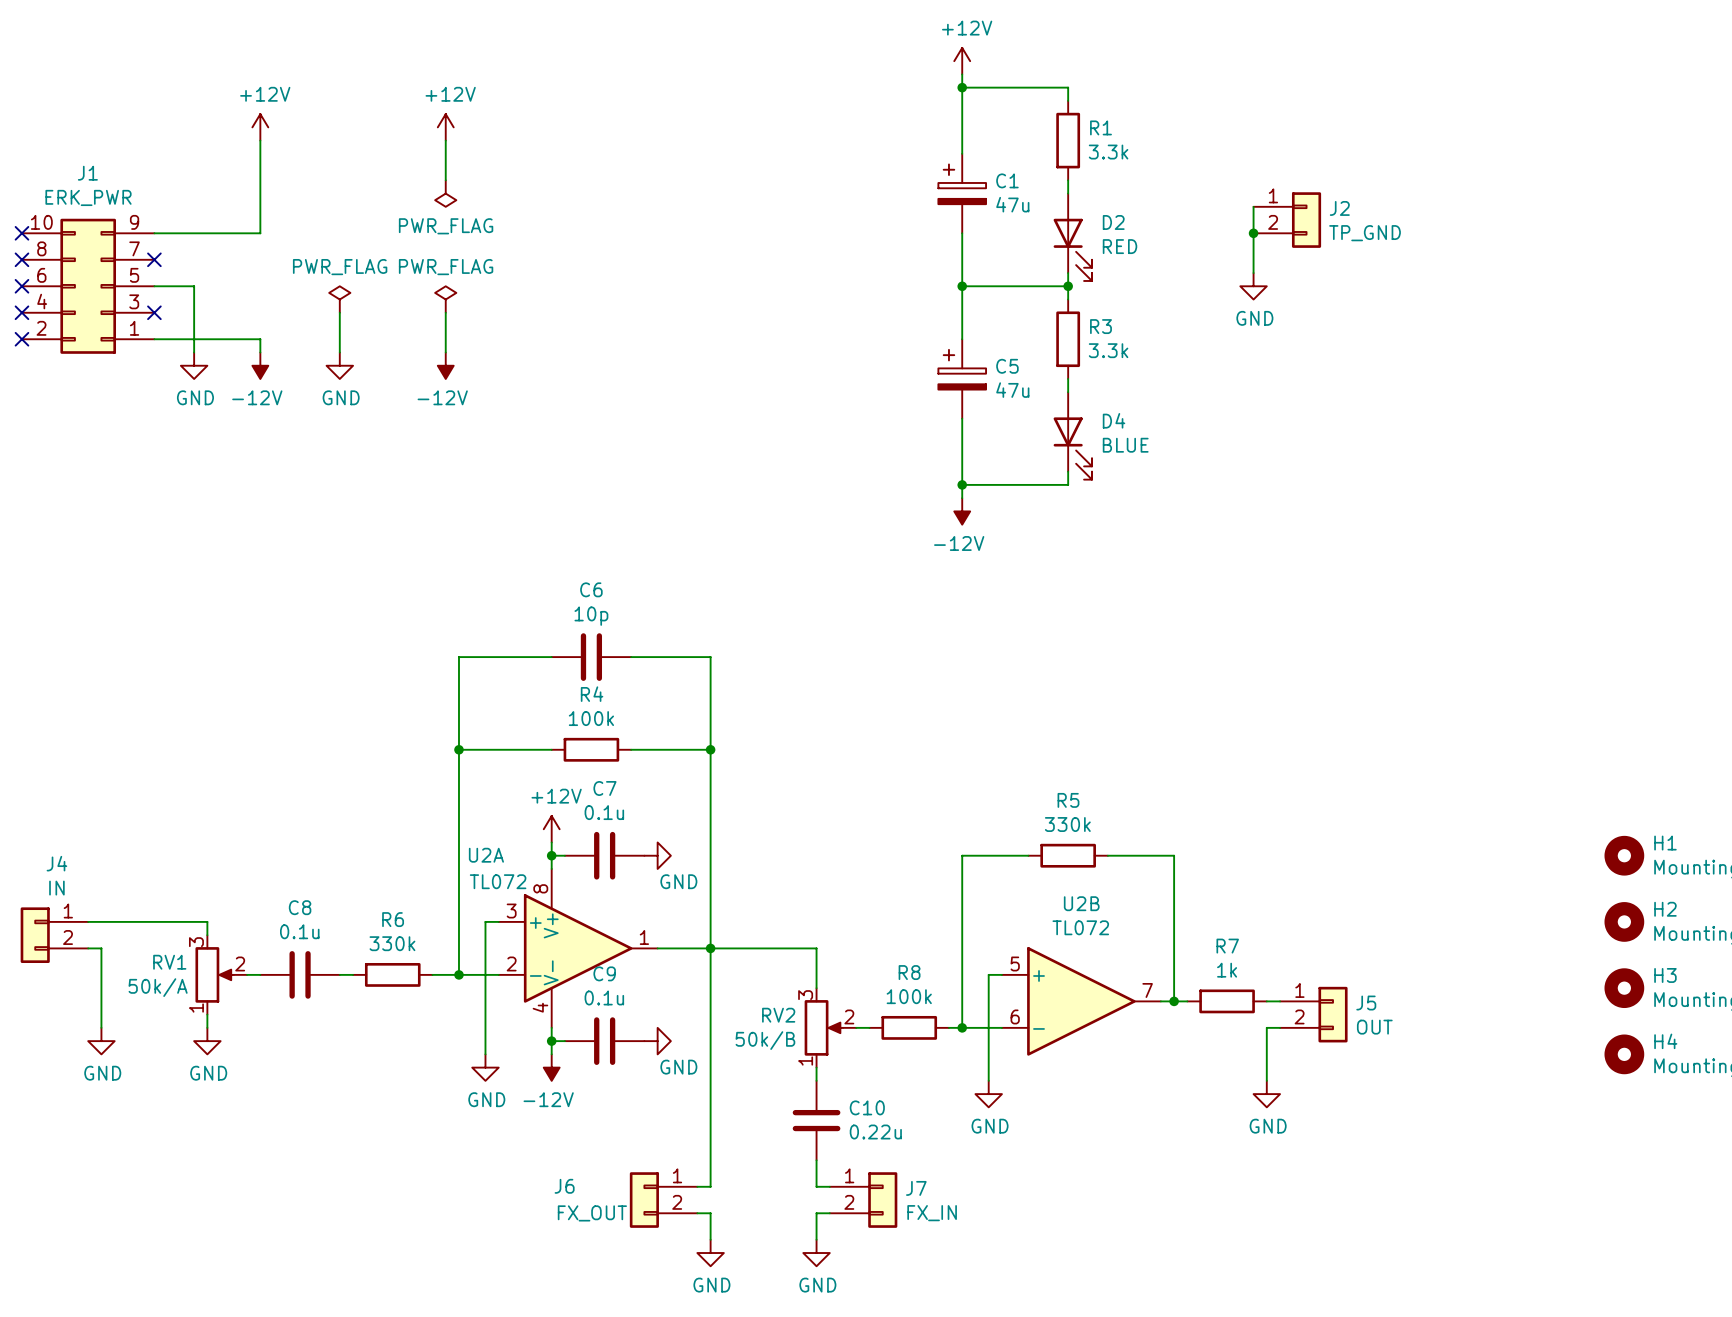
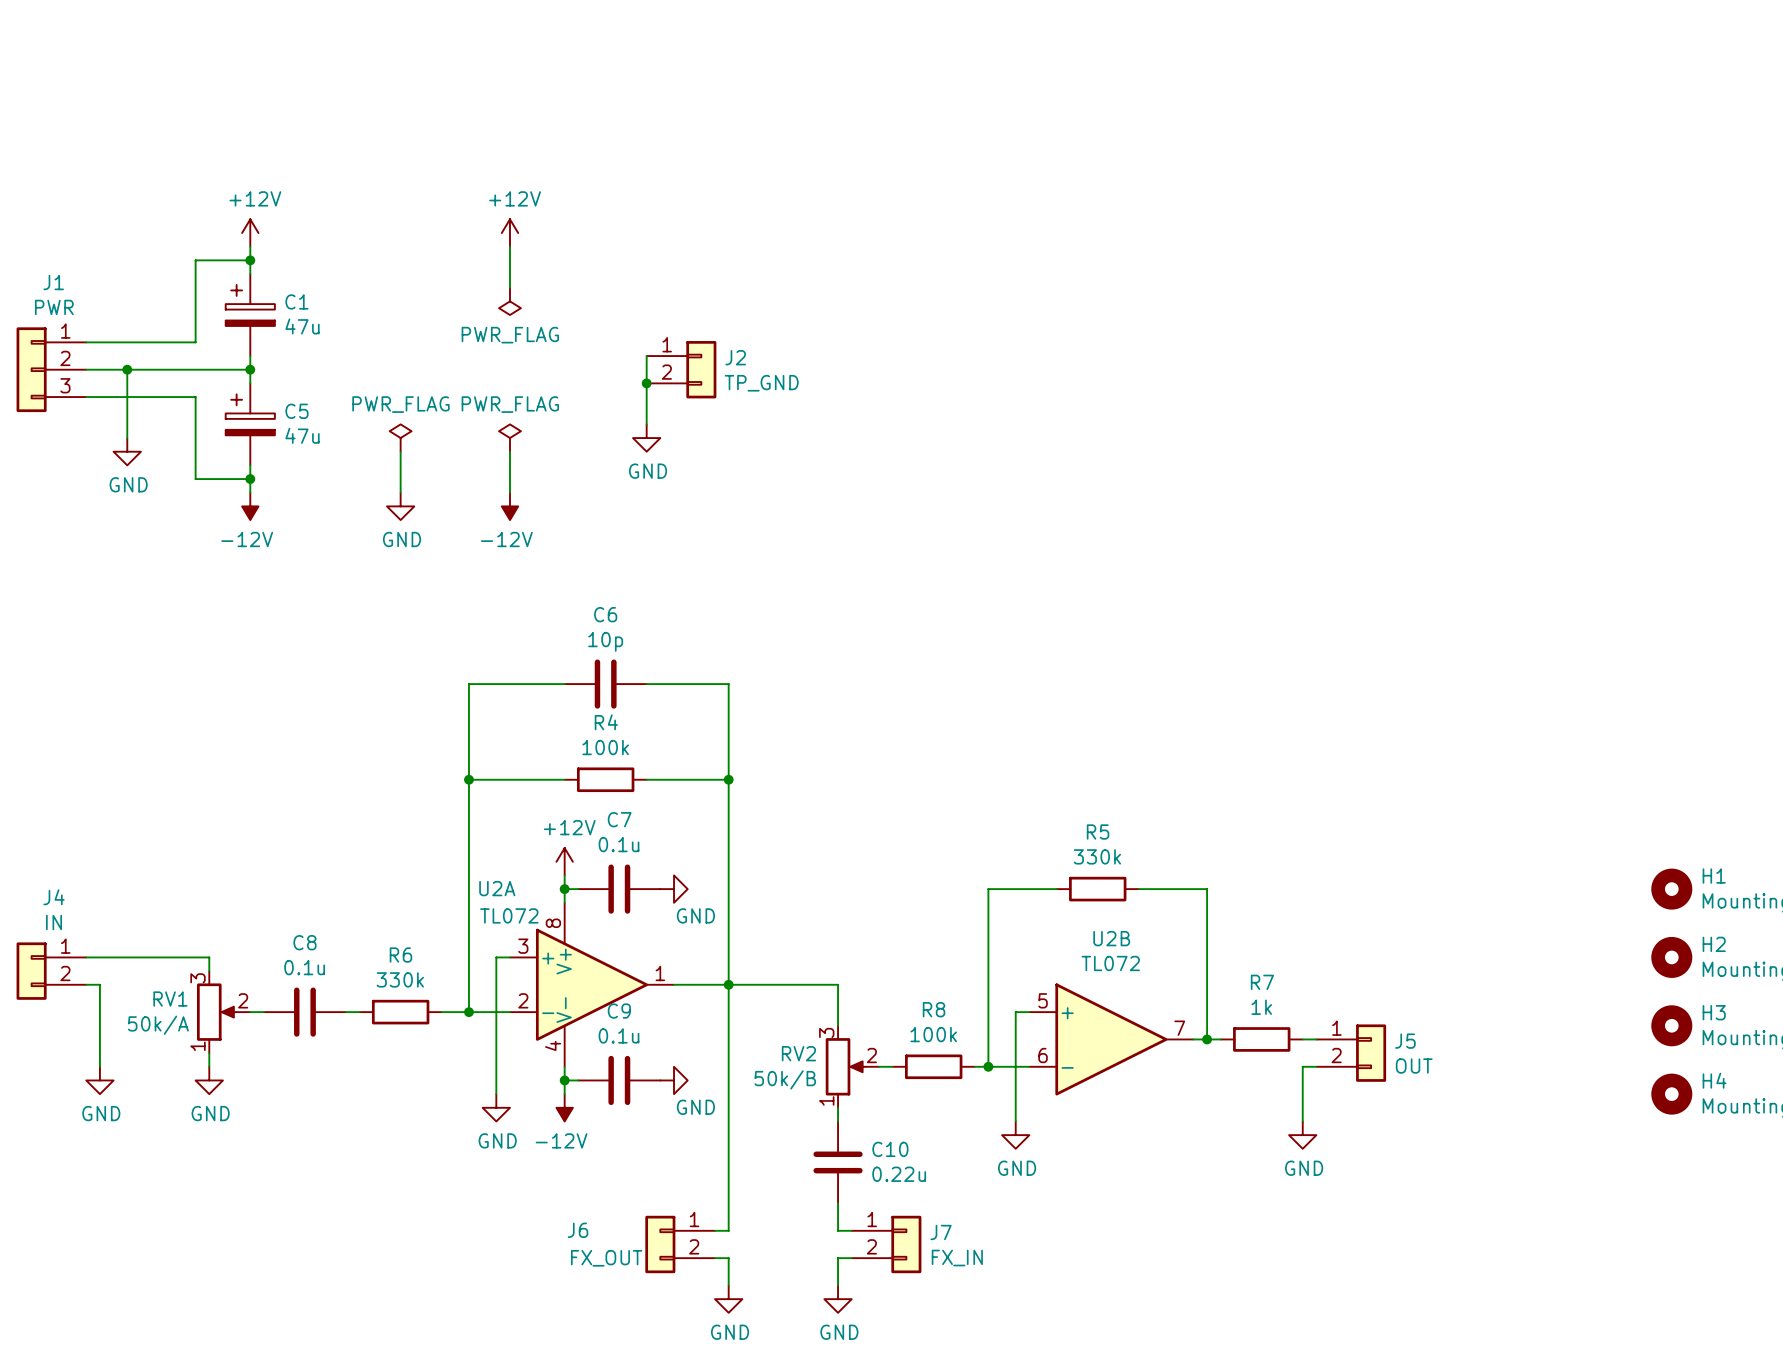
power symbol: +12V (962, 61) -> none
wire: (962, 74) (962, 153) -> none
wire: (962, 87) (1068, 87) (1068, 100) -> none
junction: (962, 87) -> none
power symbol position: +12V (260, 127) -> +12V (250, 233)
power symbol position: +12V (445, 127) -> +12V (509, 233)
wire: (260, 140) (260, 233) (154, 233) -> none
wire: (445, 140) (445, 180) -> (509, 246) (509, 287)
R1: 3.3k (1068, 140) -> none
J1 name position: J1 (87, 173) -> J1 (53, 282)
wire: (1068, 180) (1068, 193) -> none
power symbol: PWR_FLAG (445, 193) -> none
C1 position: (962, 193) -> (250, 315)
J1 value: ERK_PWR (88, 197) -> PWR (54, 307)
wire: (1253, 206) (1253, 273) -> none
J1 symbol: [21, 218, 155, 354] -> [16, 327, 87, 413]
J2 position: (1287, 220) -> (681, 369)
no-connect mark: (21, 233) -> none
wire: none -> (250, 246) (250, 274)
wire: (962, 233) (962, 339) -> none
junction: (1253, 233) -> none
D2: RED (1072, 237) -> none
junction: none -> (250, 260)
no-connect mark: (21, 259) -> none
no-connect mark: (154, 259) -> none
wire: (1068, 273) (1068, 299) -> none
no-connect mark: (21, 286) -> none
wire: (154, 286) (194, 286) -> (250, 260) (195, 260) (195, 301)
power symbol: none -> PWR_FLAG (509, 301)
wire: (962, 286) (1068, 286) -> none
junction: (962, 286) -> none
junction: (1068, 286) -> none
power symbol: GND (1253, 286) -> none
power symbol: PWR_FLAG (339, 299) -> none
power symbol: PWR_FLAG (445, 299) -> none
no-connect mark: (21, 312) -> none
no-connect mark: (154, 312) -> none
wire: (339, 312) (339, 352) -> (400, 451) (400, 492)
wire: (445, 312) (445, 352) -> (509, 451) (509, 492)
wire: (194, 326) (194, 352) -> (195, 342) (86, 342)
no-connect mark: (21, 339) -> none
wire: (154, 339) (260, 339) (260, 352) -> none
wire: none -> (250, 356) (250, 383)
wire: none -> (646, 356) (646, 424)
R3: 3.3k (1068, 339) -> none
wire: none -> (86, 369) (250, 369)
wire: none -> (127, 369) (127, 438)
junction: none -> (127, 369)
junction: none -> (250, 369)
power symbol position: GND (194, 365) -> GND (127, 451)
power symbol: -12V (260, 365) -> none
power symbol: GND (339, 365) -> none
power symbol: -12V (445, 365) -> none
junction: none -> (646, 383)
wire: none -> (86, 397) (195, 397) (195, 479) (250, 479)
C5 position: (962, 378) -> (250, 424)
wire: (1068, 378) (1068, 392) -> none
power symbol: none -> PWR_FLAG (400, 438)
power symbol: none -> PWR_FLAG (509, 438)
power symbol: none -> GND (646, 438)
wire: (962, 418) (962, 498) -> none
D4: BLUE (1072, 435) -> none
wire: none -> (250, 465) (250, 492)
junction: none -> (250, 479)
wire: (1068, 471) (1068, 484) (962, 484) -> none
power symbol: none -> -12V (250, 506)
power symbol: none -> GND (400, 506)
power symbol: none -> -12V (509, 506)
junction: (962, 484) -> none
power symbol: -12V (962, 511) -> none

